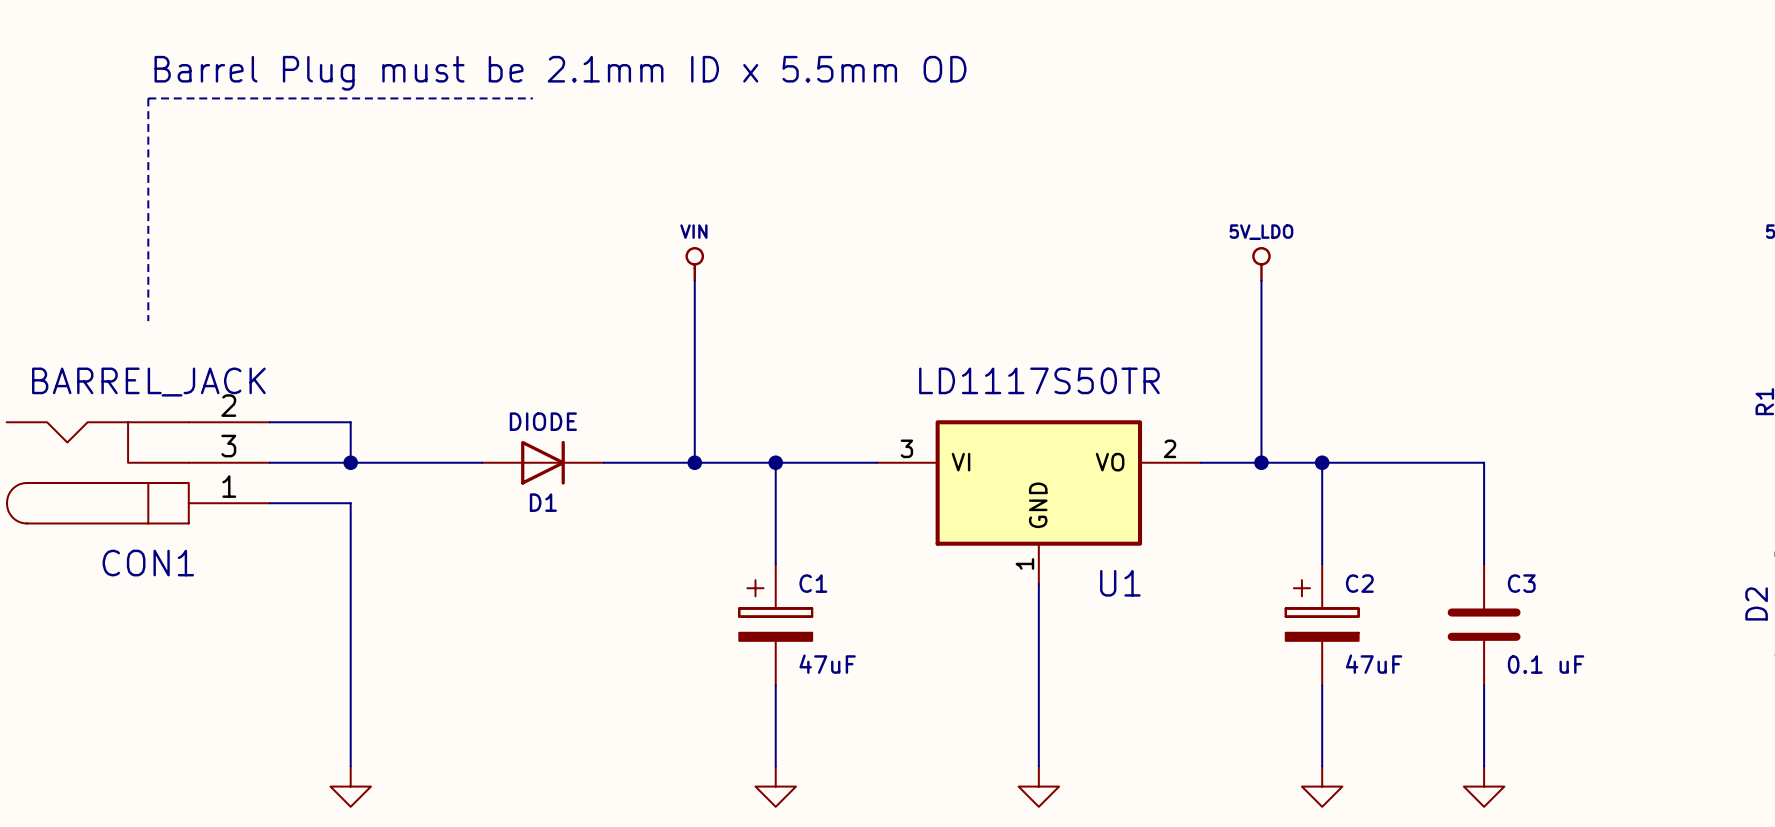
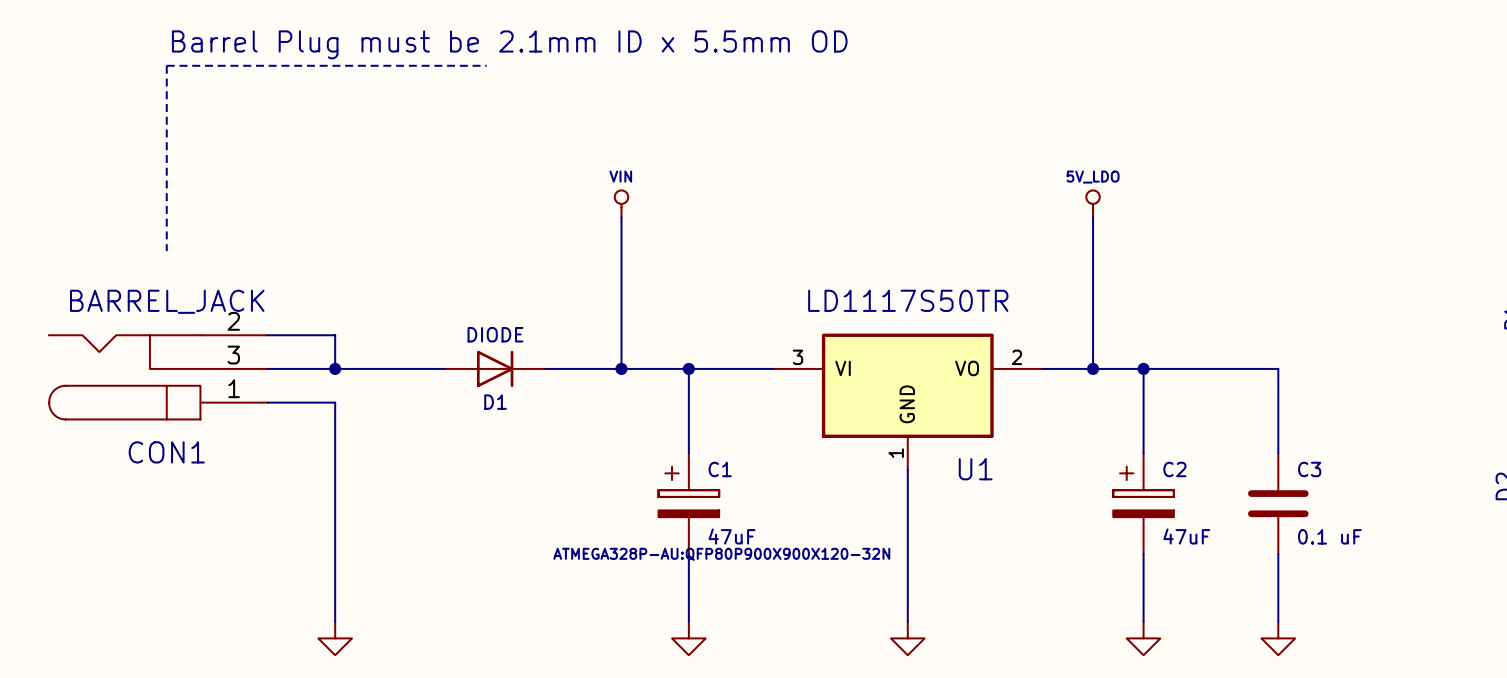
C1 text: none -> ATMEGA328P-AU:QFP80P900X900X120-32N (721, 554)

